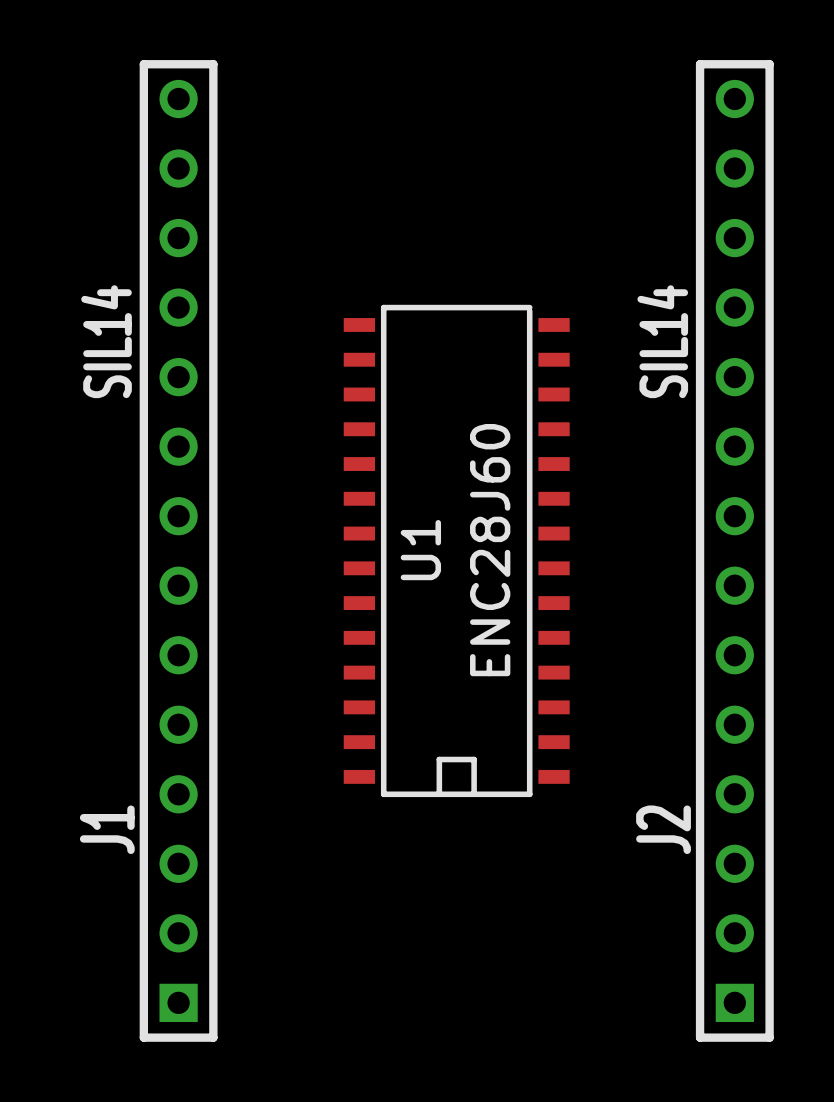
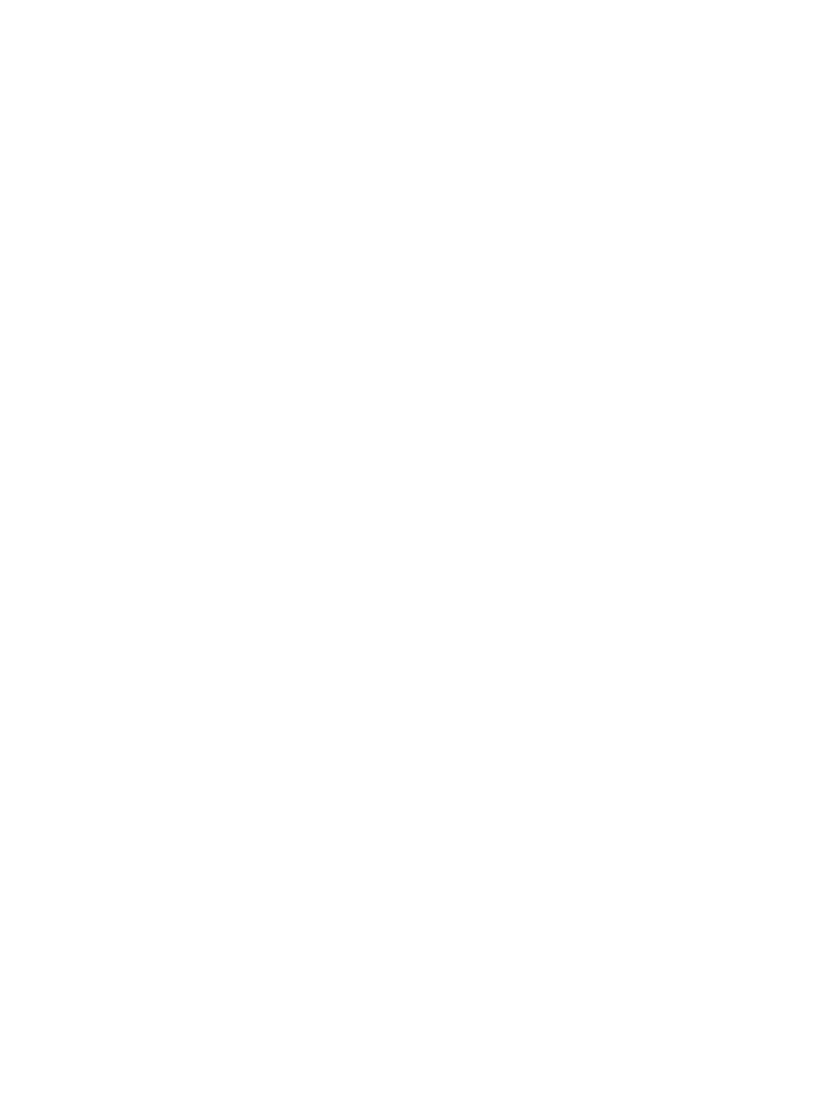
J1: SIL14 (178, 550) -> none
U1: ENC28J60 (456, 550) -> none
J2: SIL14 (734, 550) -> none

